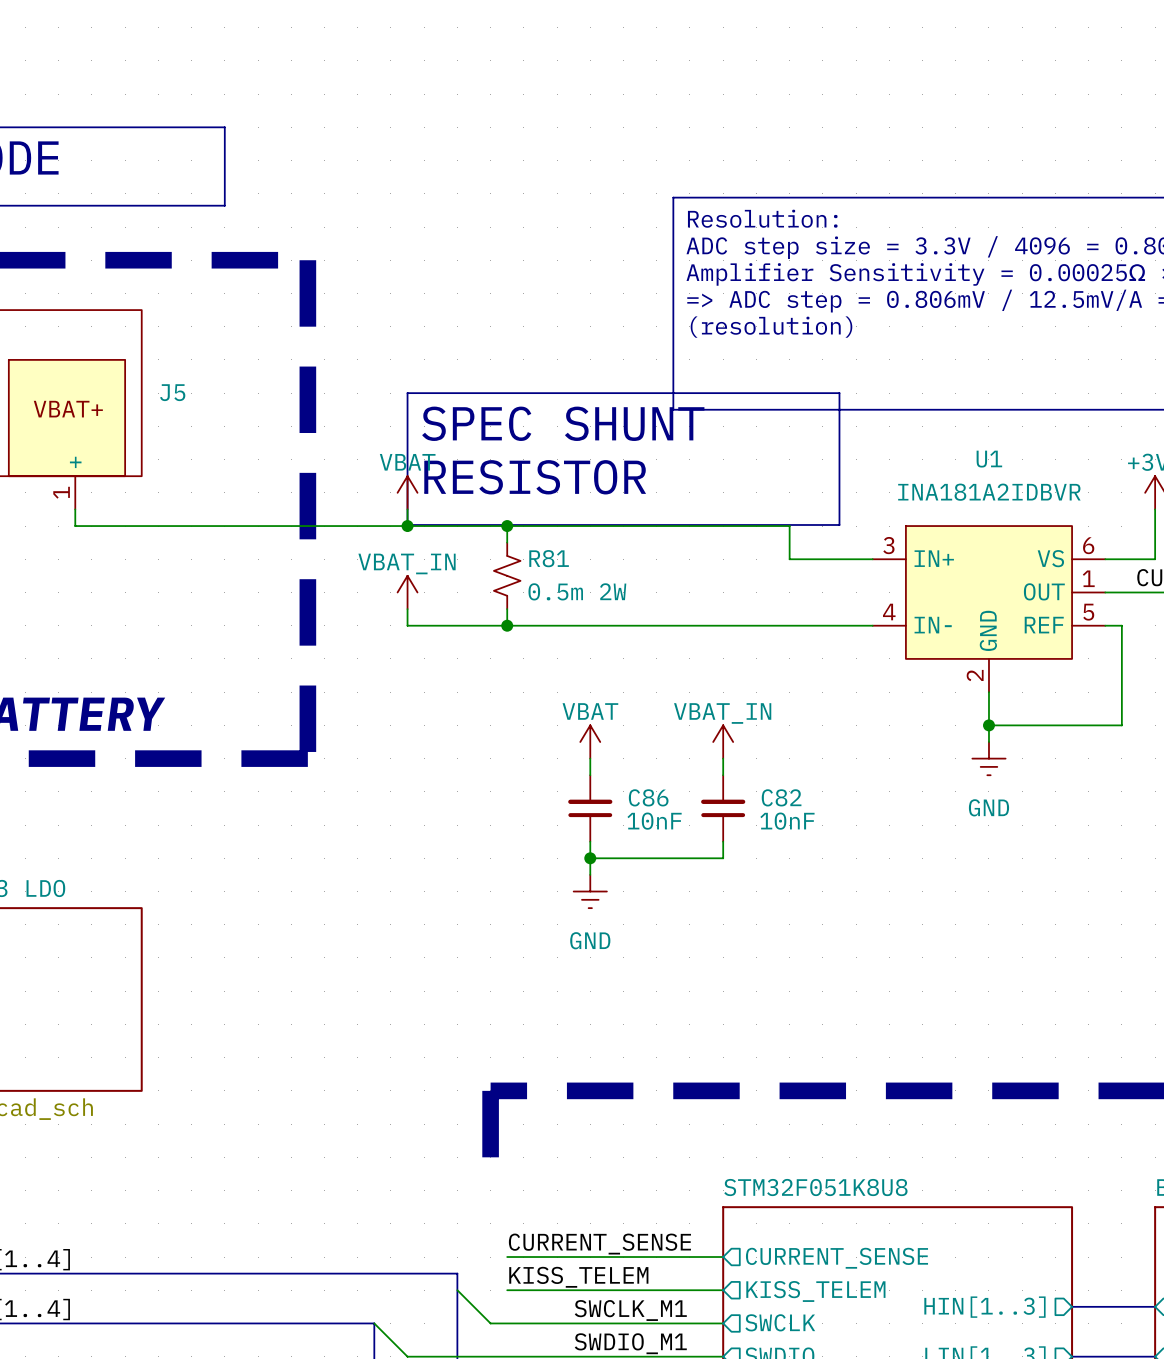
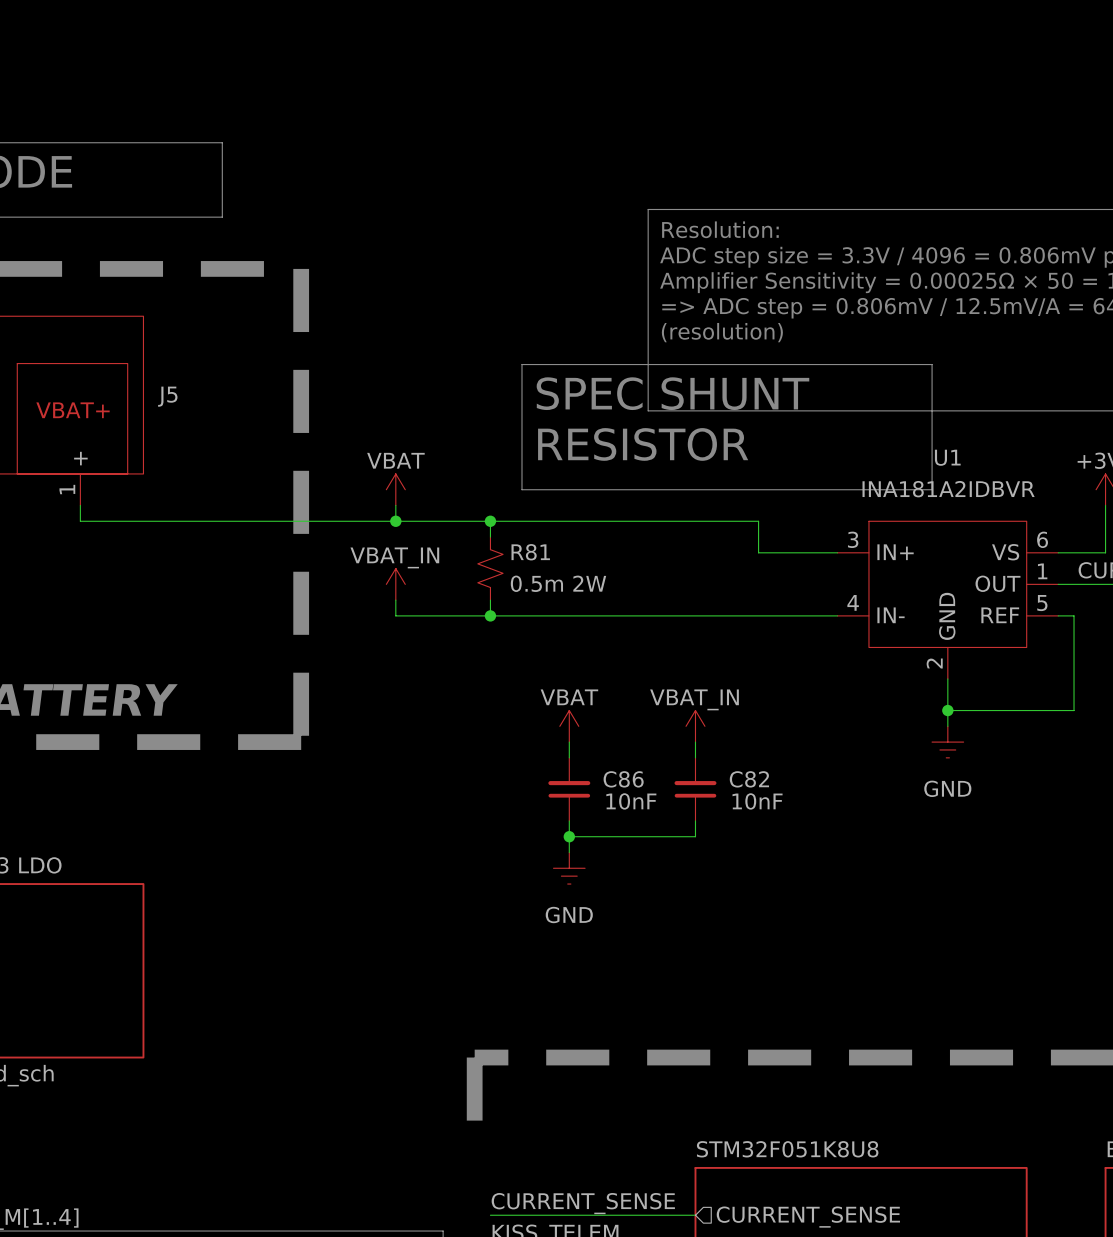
line: (407, 393) (839, 393) (839, 524) (407, 524) (407, 393) -> (521, 364) (932, 364) (932, 489) (521, 489) (521, 364)
text position: SPEC SHUNT (563, 423) -> SPEC SHUNT (672, 393)
text position: RESISTOR (535, 477) -> RESISTOR (643, 444)

